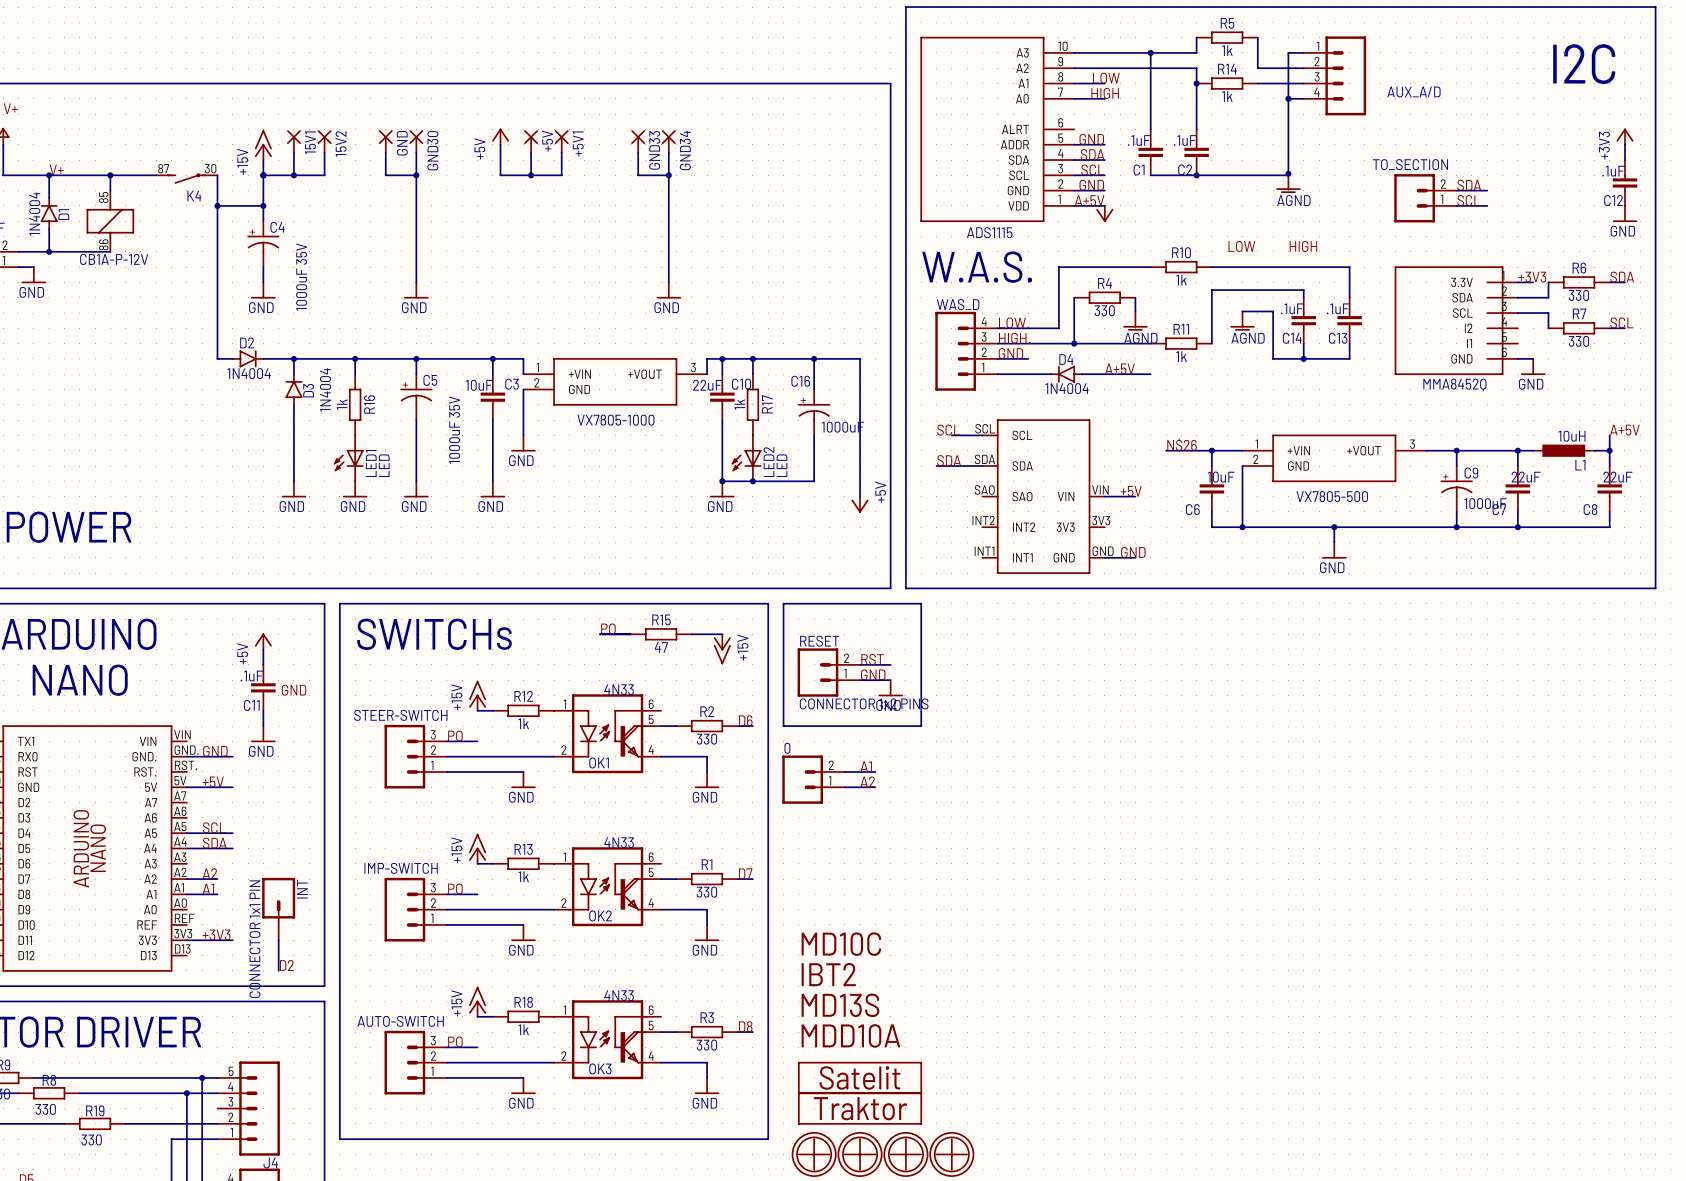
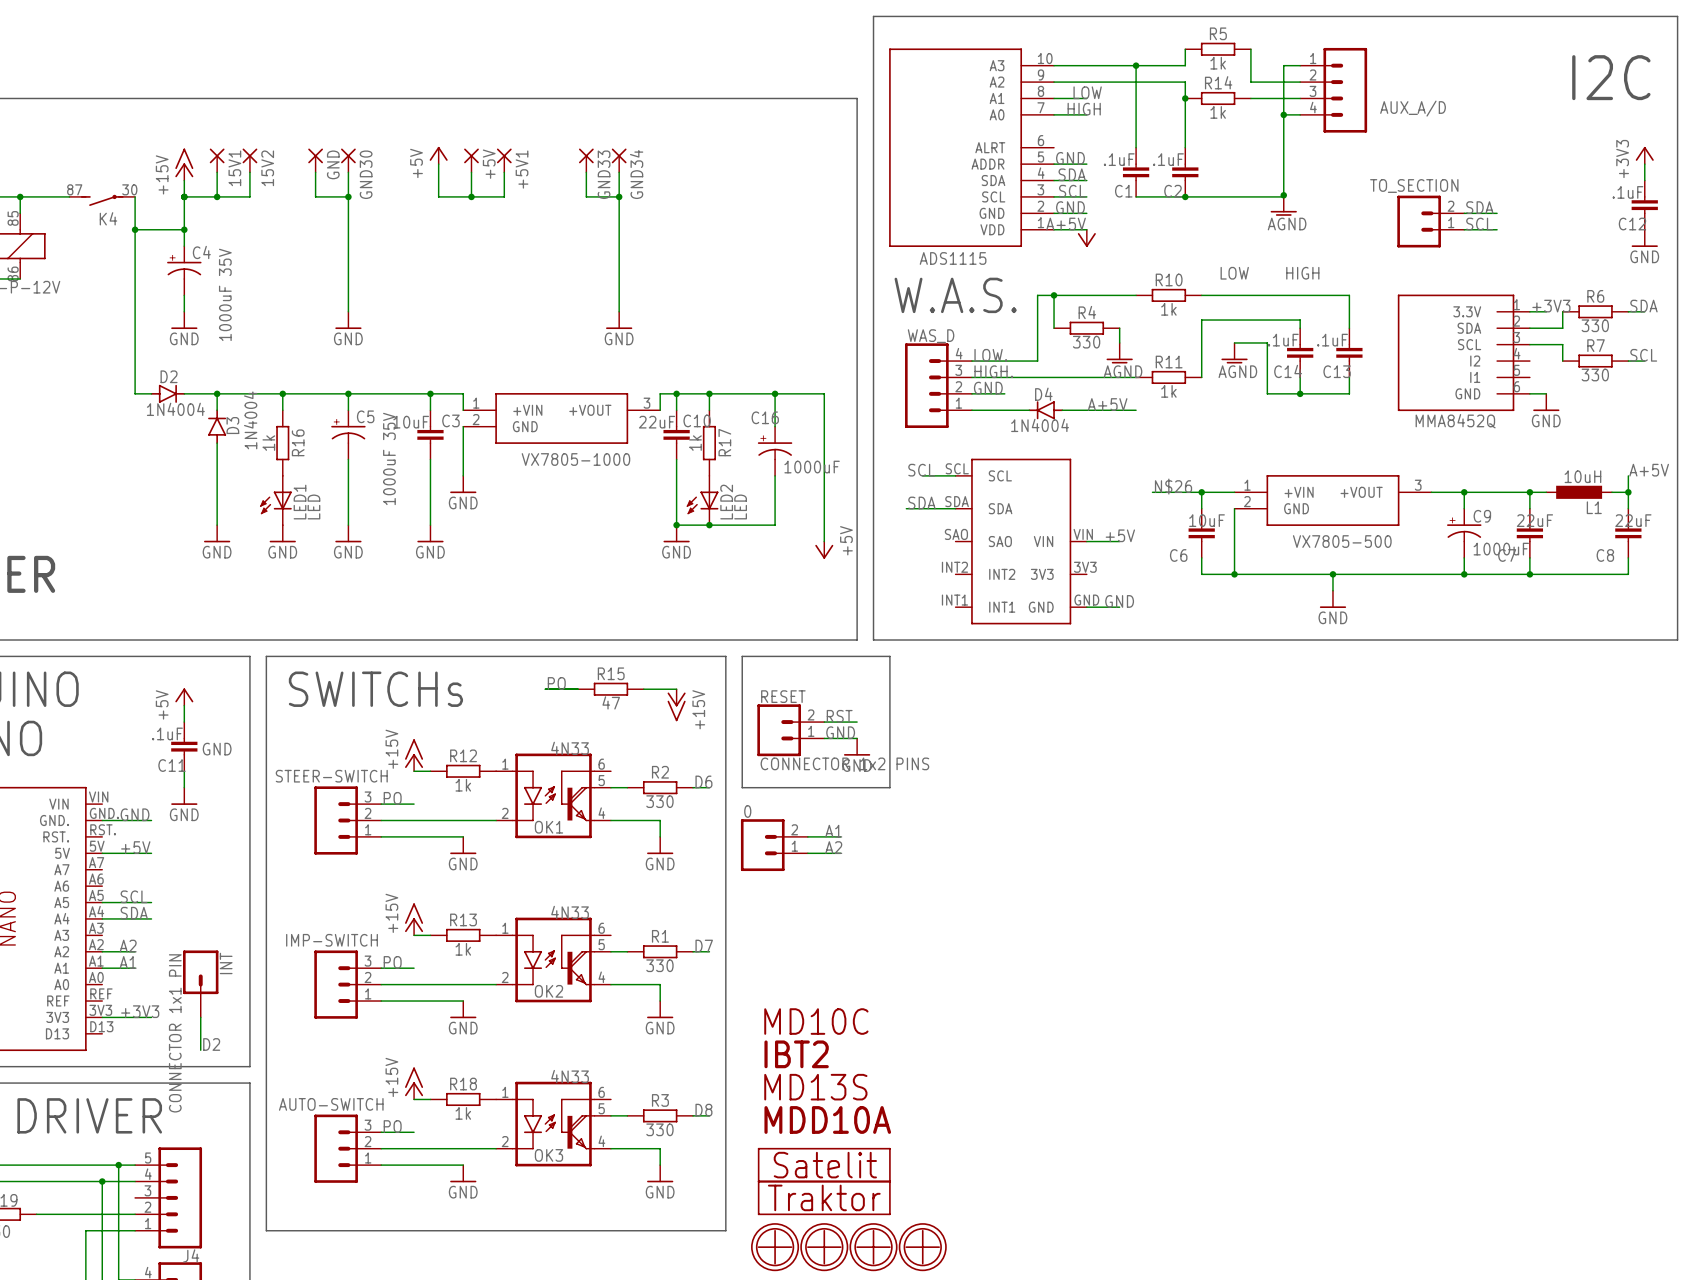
junction: none -> (1054, 295)
wire: (1074, 297) (1074, 343) -> (1054, 328) (1054, 295)
junction: (1074, 343) -> none

